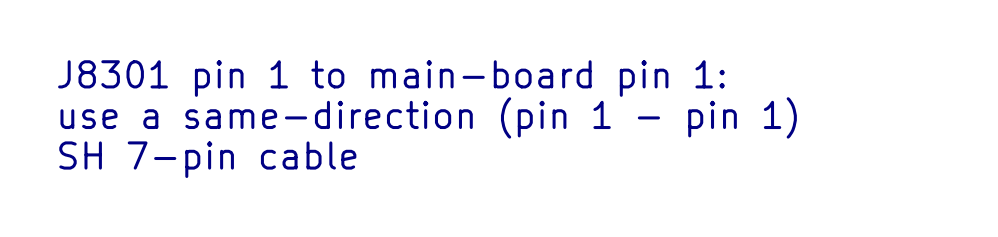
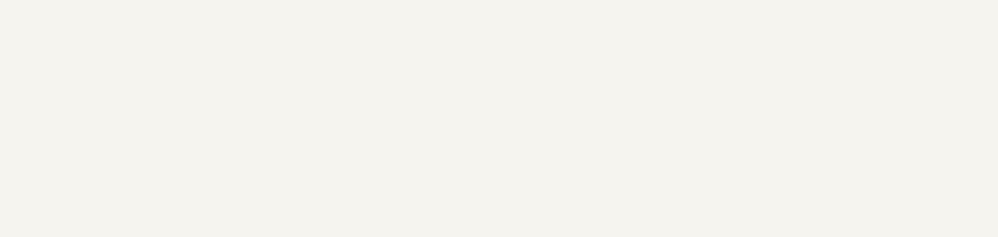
text: J8301 pin 1 to main-board pin 1: (391, 78) -> none
text: use a same-direction (pin 1 - pin 1) (428, 117) -> none
text: SH 7-pin cable (207, 159) -> none

